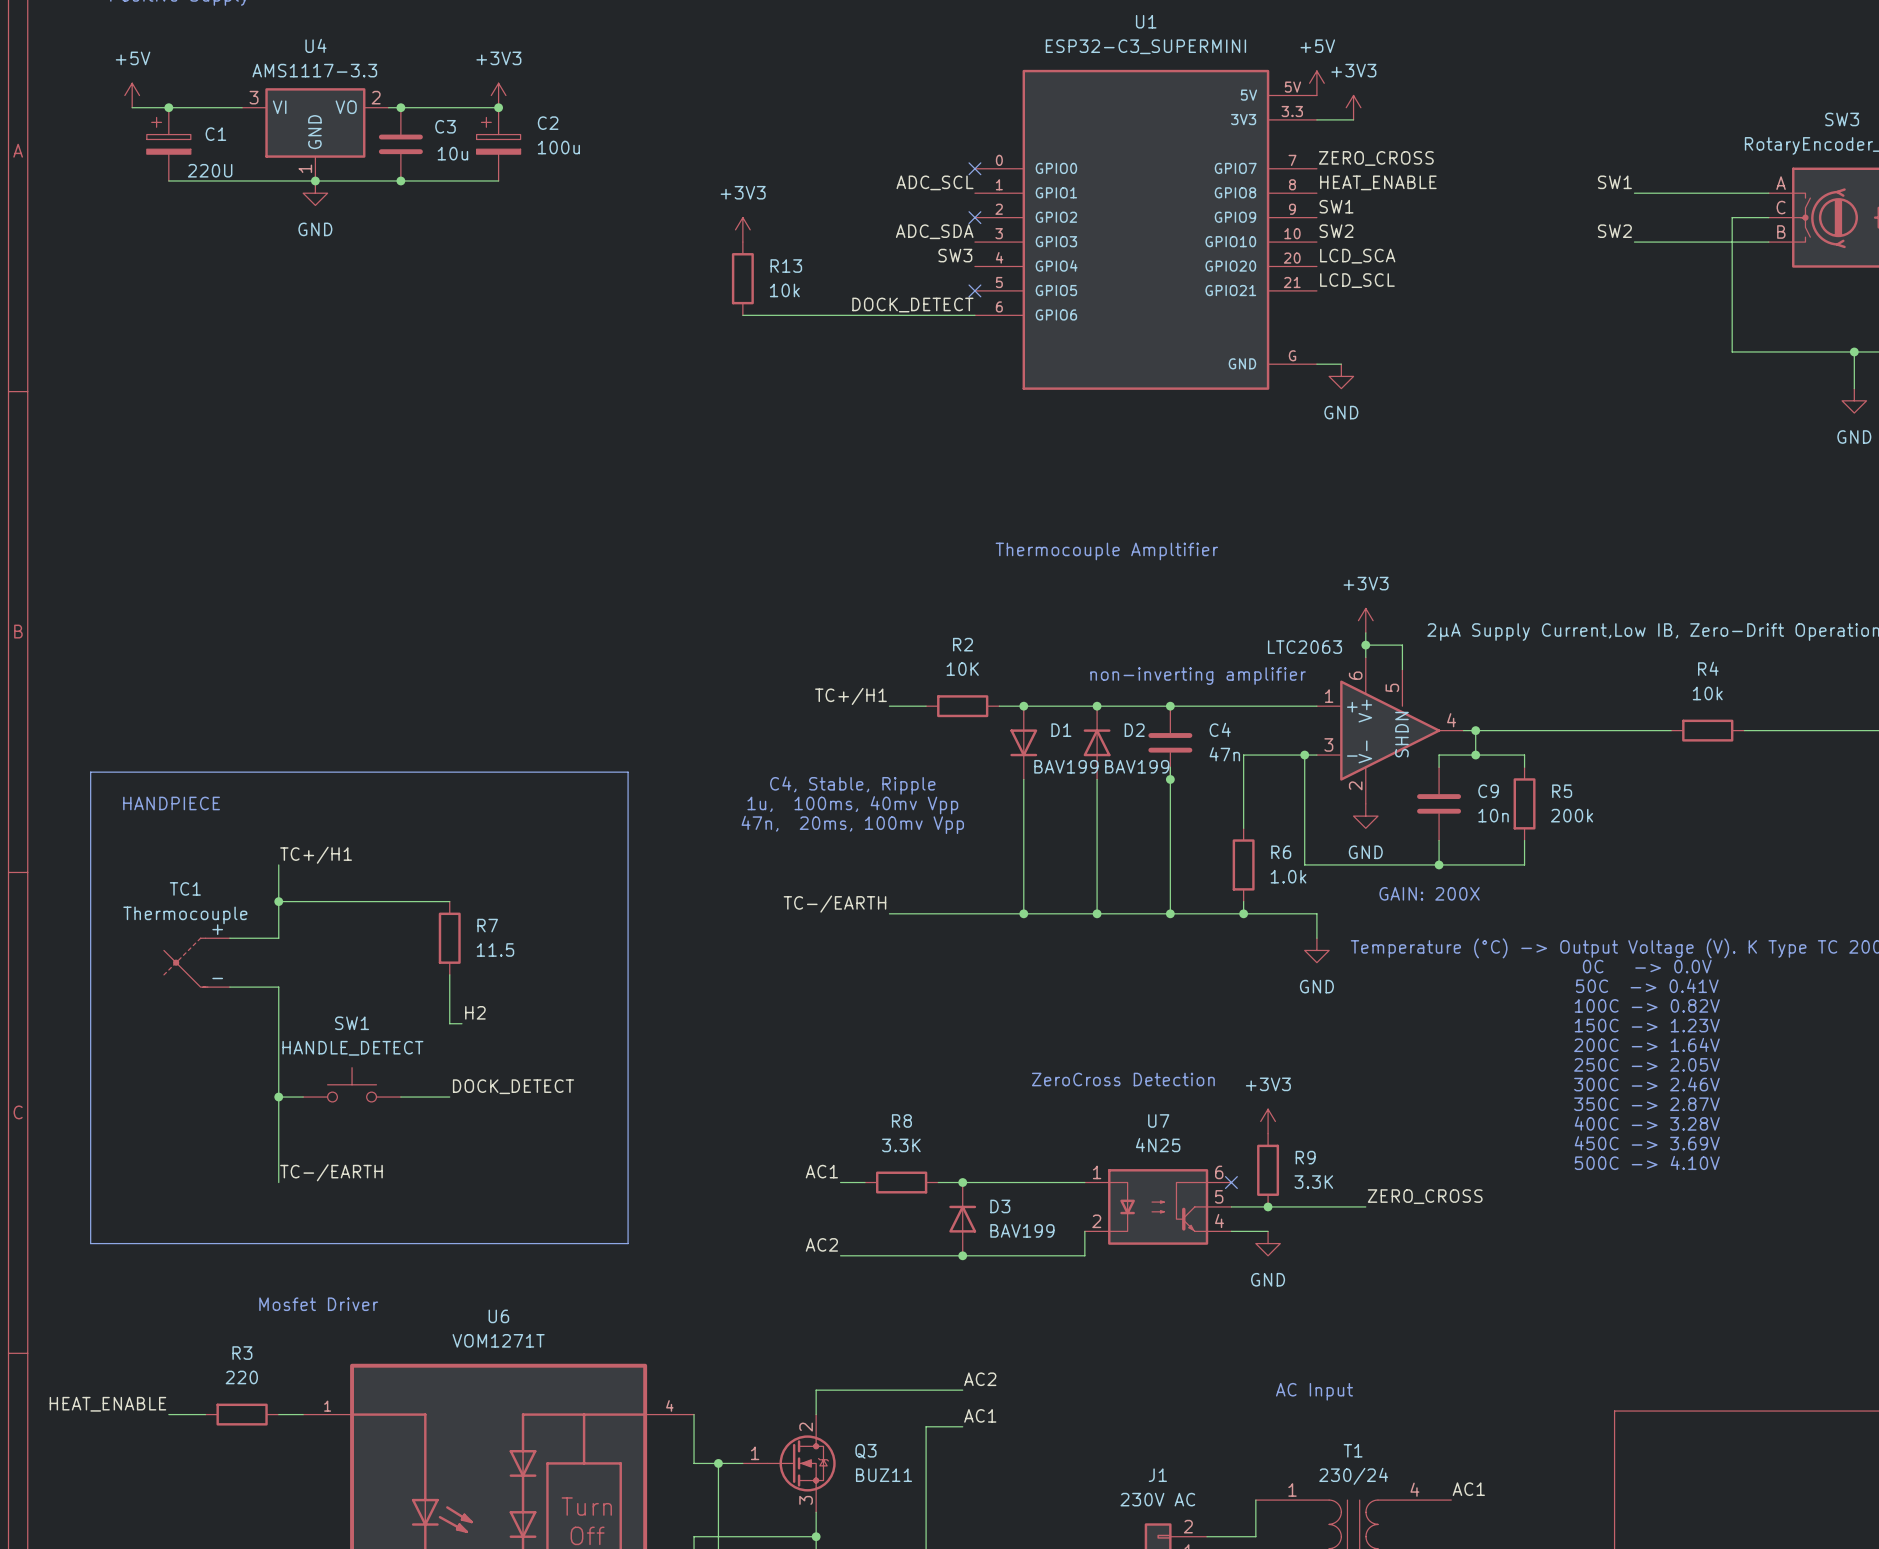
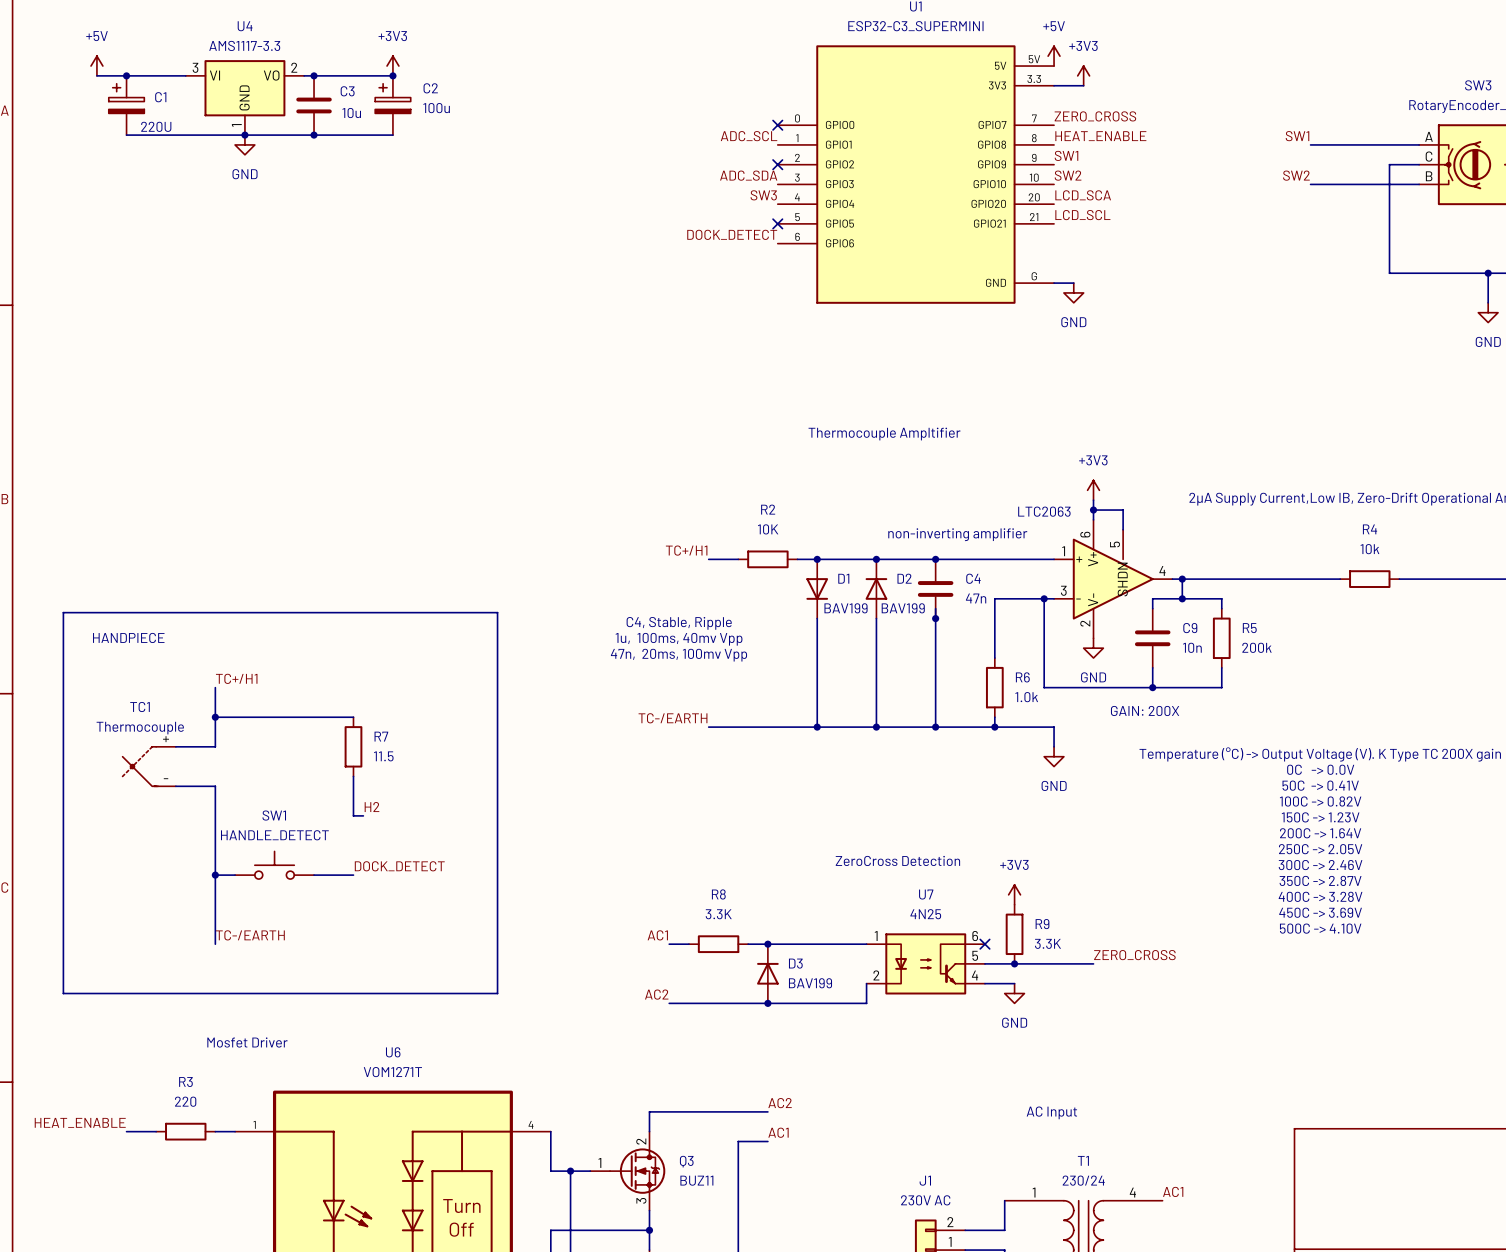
power symbol: +3V3 (742, 229) -> none
R13: 10k (742, 278) -> none
wire: (742, 315) (974, 315) -> none

